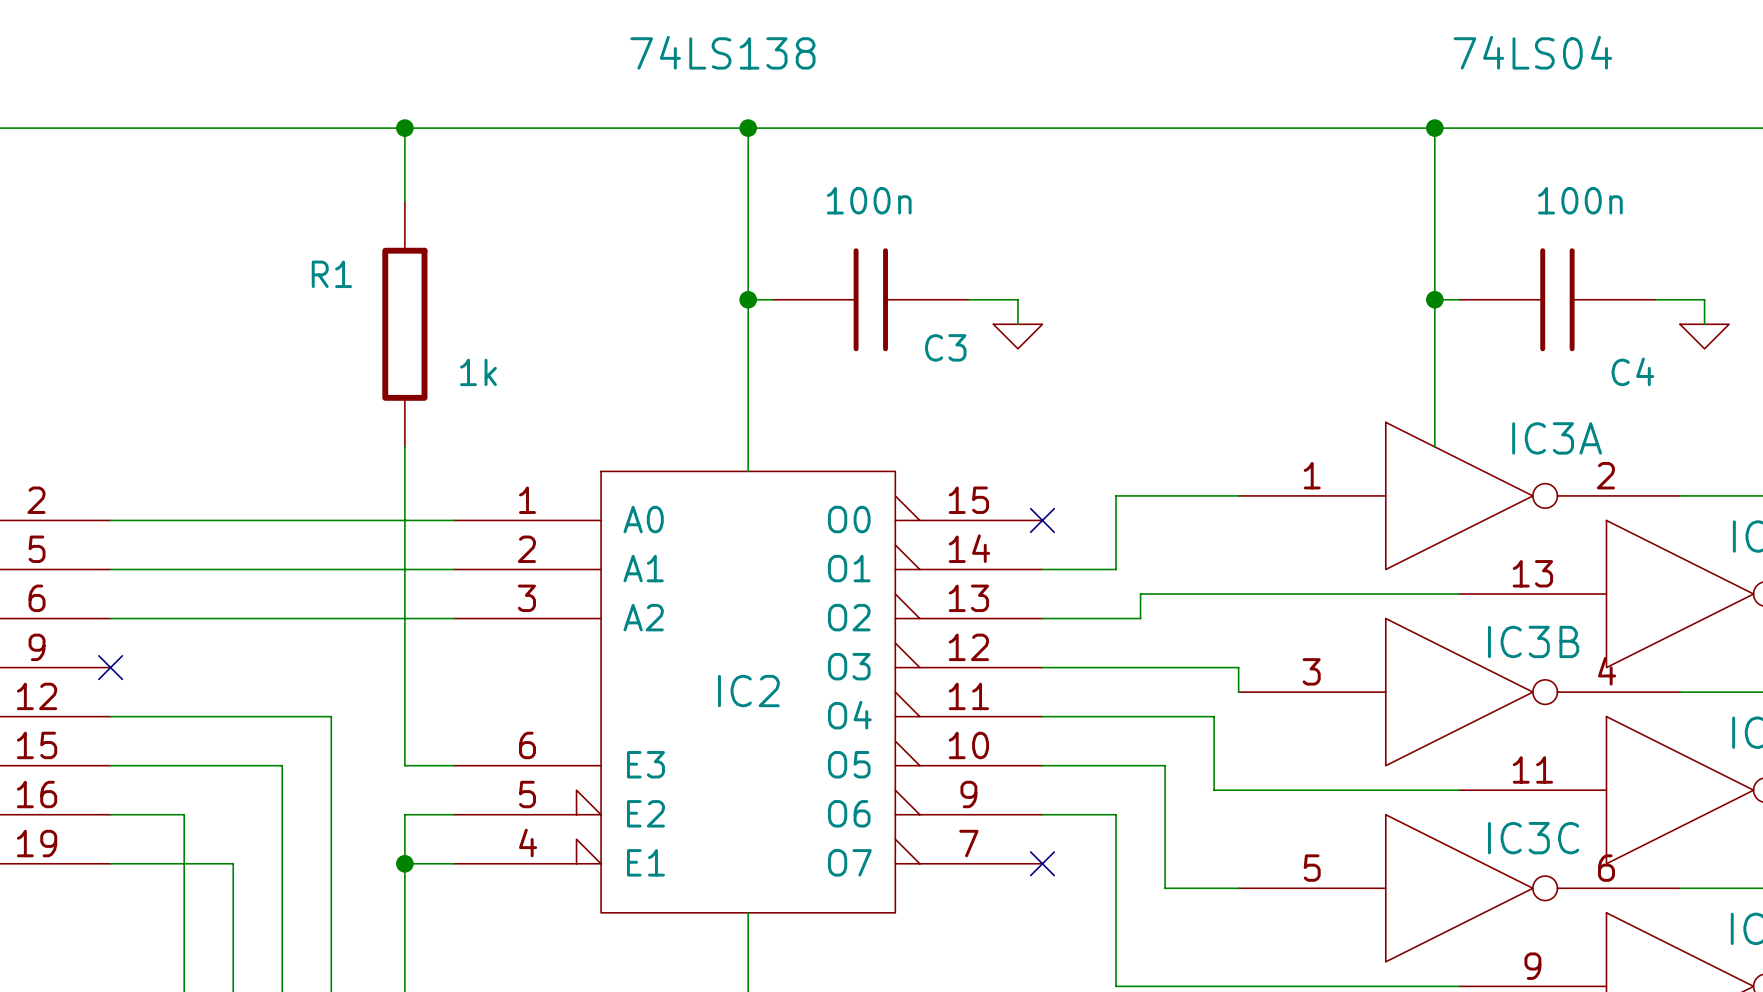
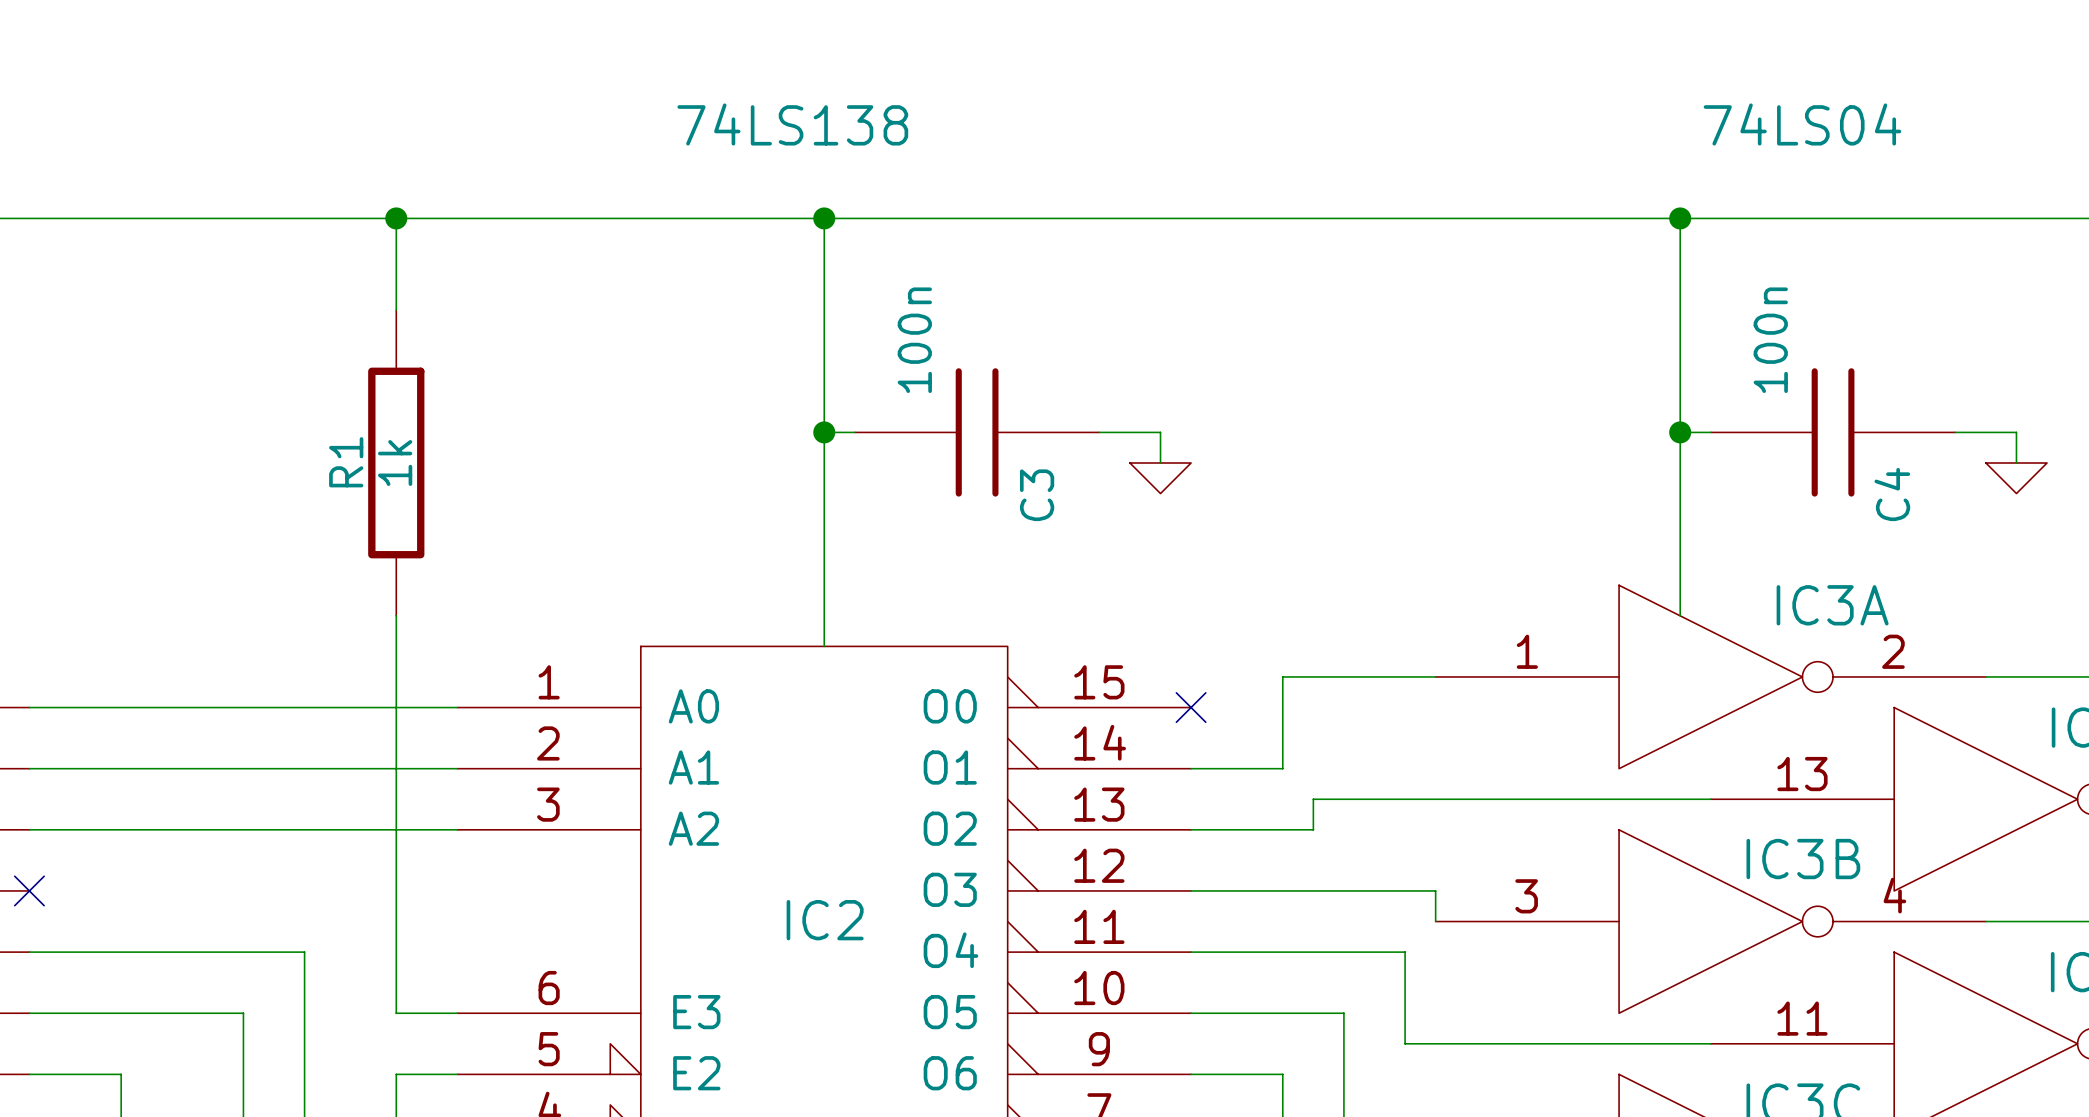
C3 value rotation: 0° (869, 200) -> 90° counterclockwise (914, 340)
C4 value rotation: 0° (1580, 200) -> 90° counterclockwise (1770, 340)
R1 name rotation: 0° (331, 274) -> 90° counterclockwise (346, 462)
C3 name rotation: 0° (945, 347) -> 90° counterclockwise (1037, 495)
C4 name rotation: 0° (1632, 371) -> 90° counterclockwise (1892, 494)
R1 value rotation: 0° (478, 372) -> 90° counterclockwise (395, 462)
R1 value position: 1k (478, 372) -> 1k (395, 462)

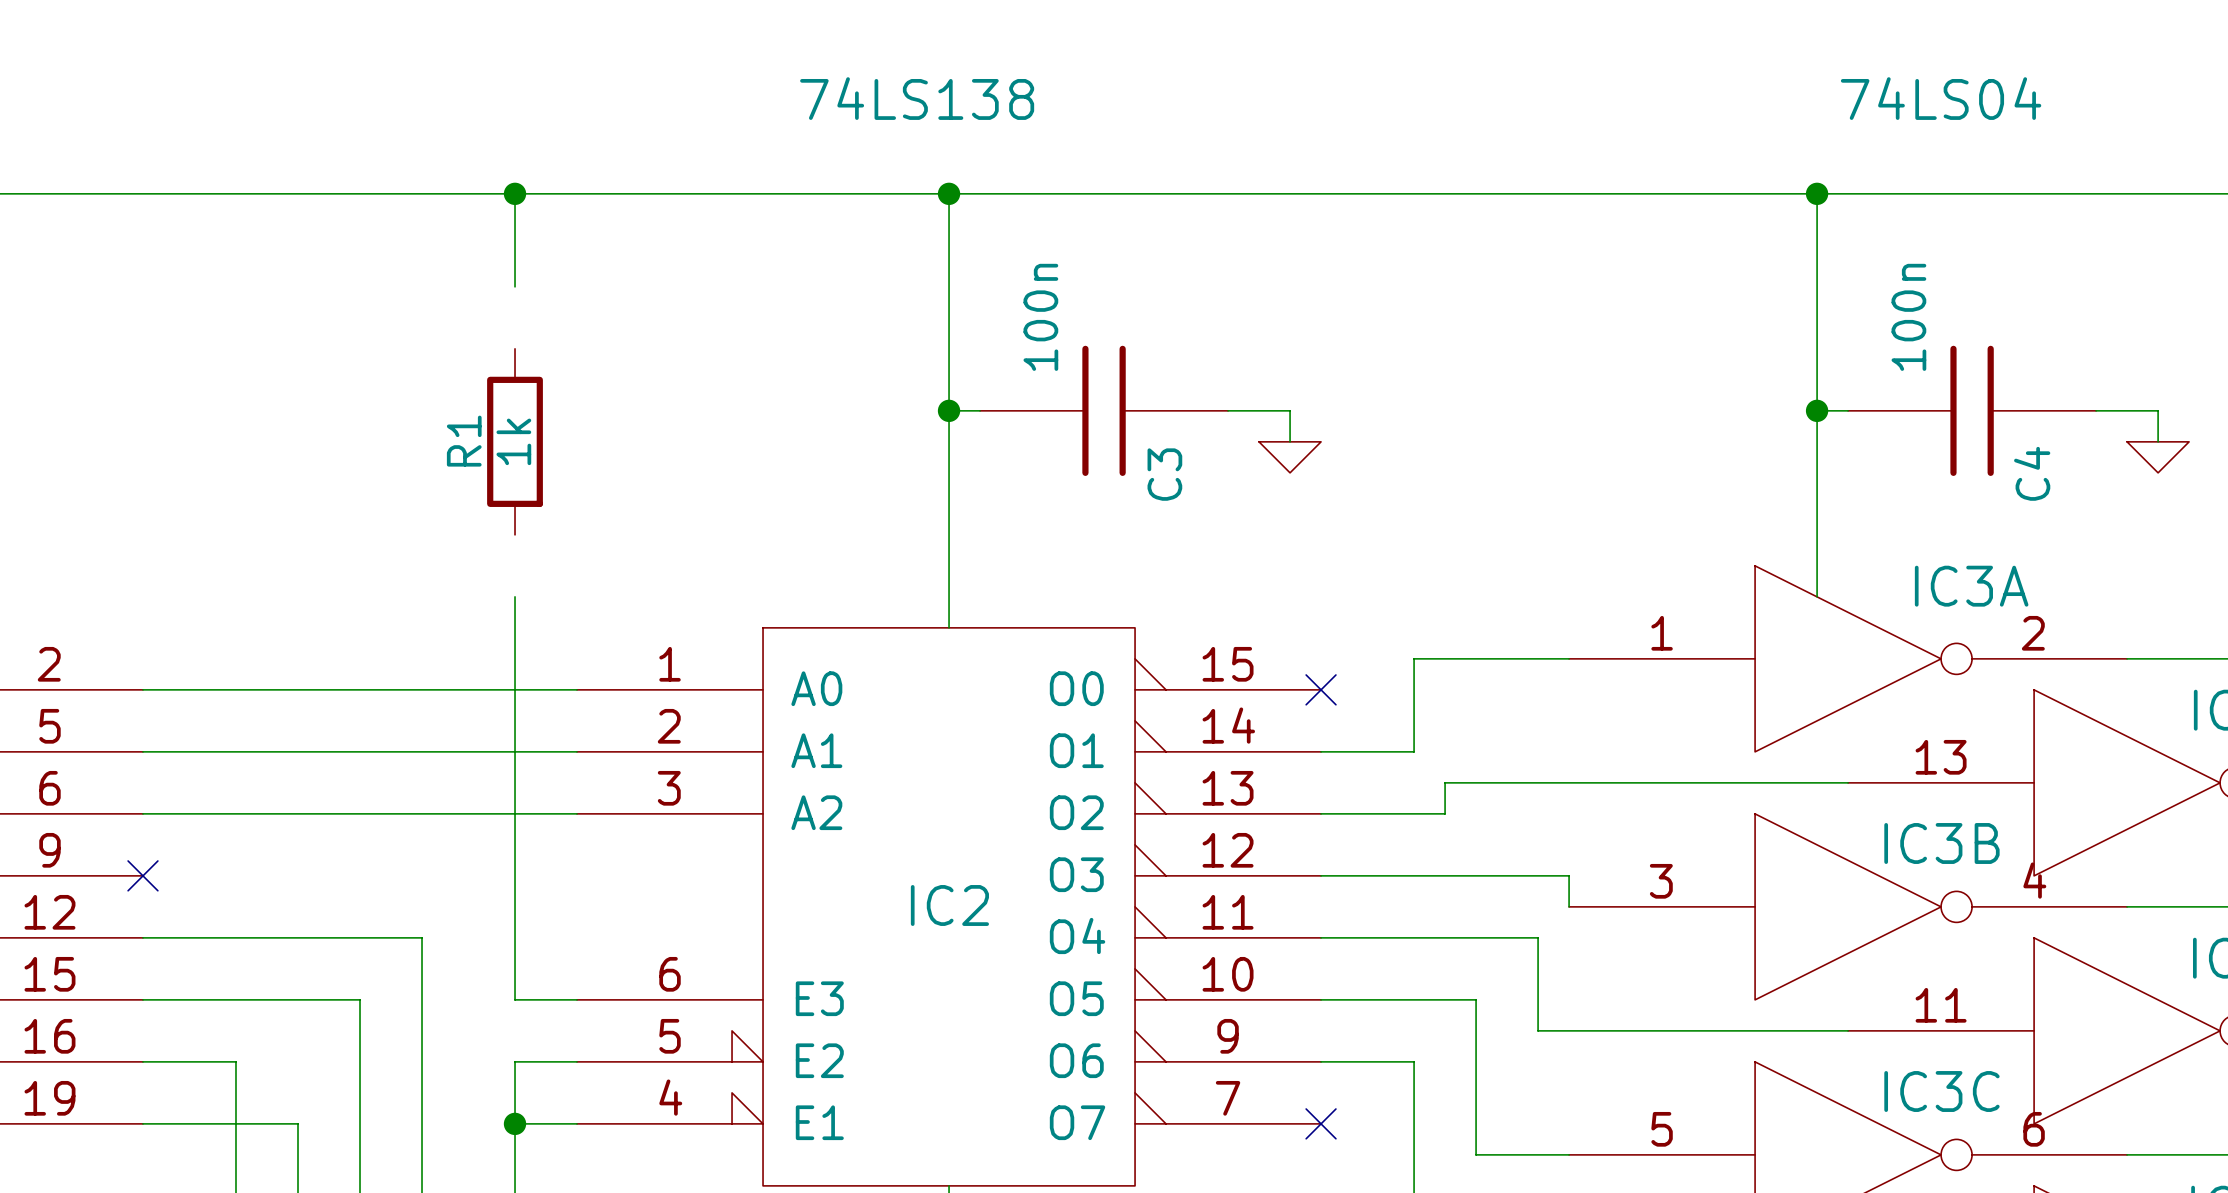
R1 symbol: [368, 310, 425, 616] -> [487, 348, 543, 535]

